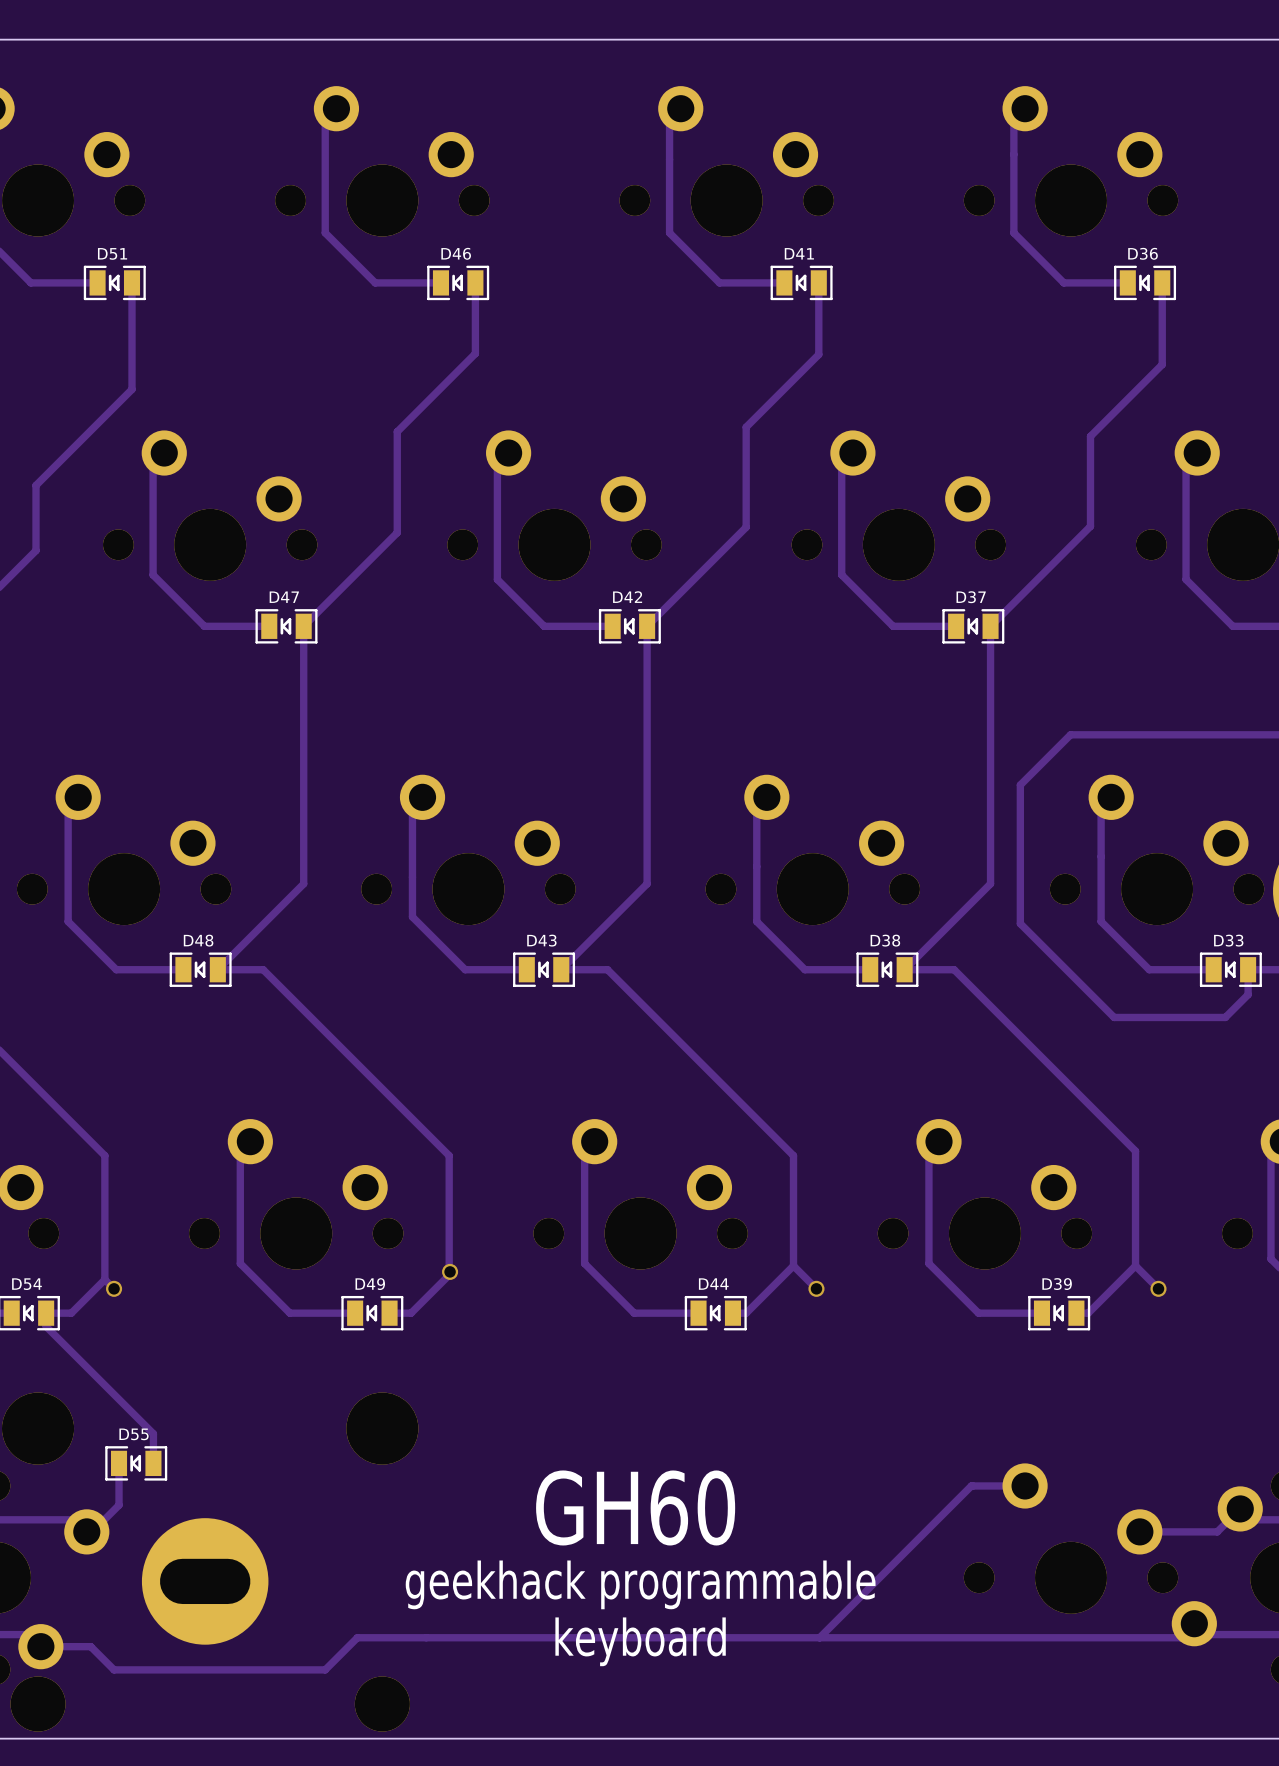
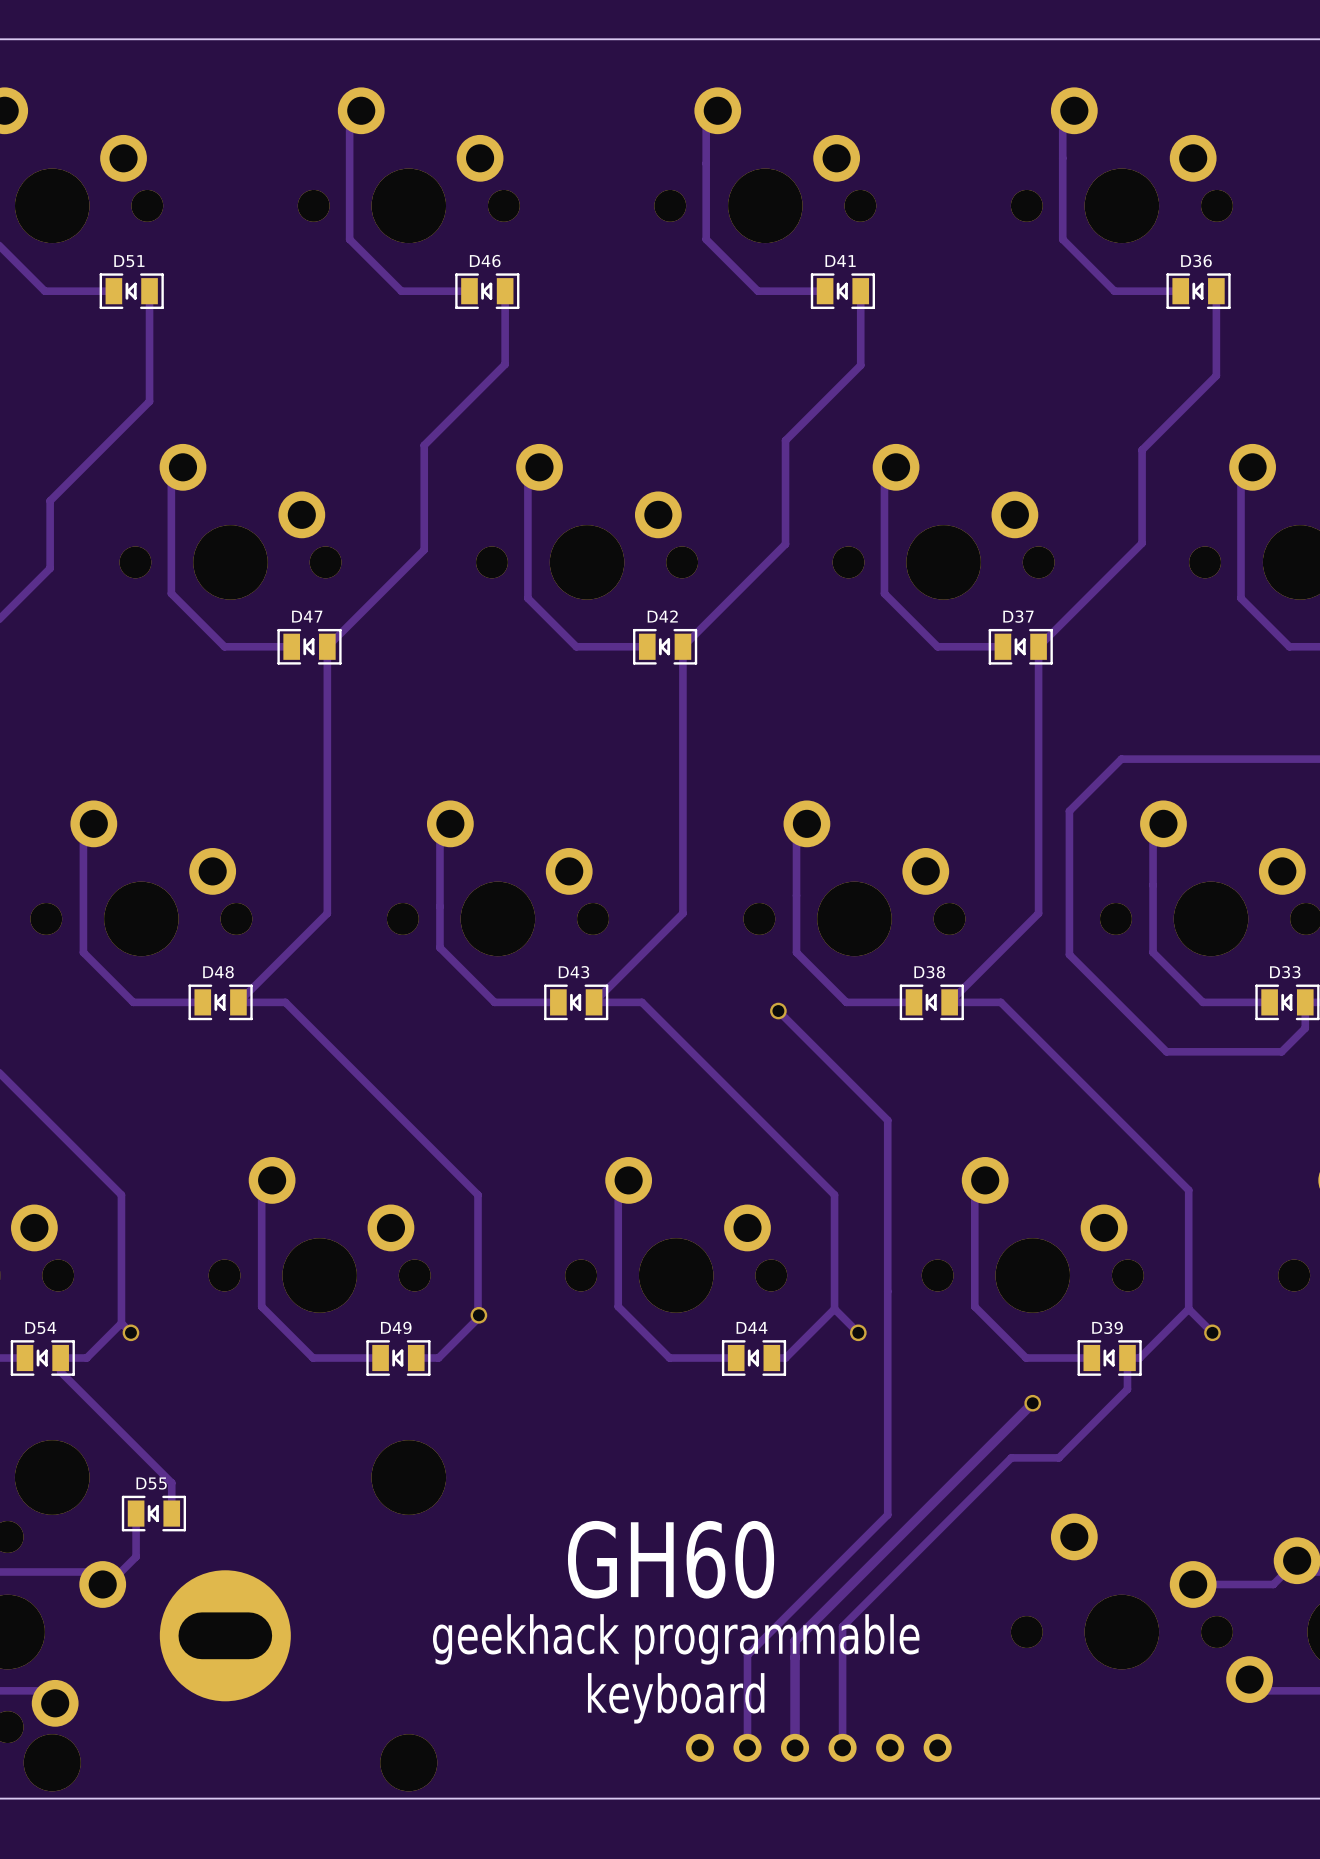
track: none -> (778, 1011) (887, 1120) (887, 1514) (747, 1655) (747, 1747)
via: none -> (778, 1011)
track: none -> (1127, 1358) (1127, 1389) (1058, 1457) (1011, 1457) (842, 1626) (842, 1747)
track: none -> (1032, 1403) (795, 1640) (795, 1747)
via: none -> (1032, 1403)
track: (1025, 1485) (971, 1485) (819, 1637) -> none
track: (1194, 1623) (1180, 1637) (357, 1637) (325, 1669) (114, 1669) (90, 1646) (40, 1646) -> none
part: none -> (699, 1747)
part: none -> (747, 1747)
part: none -> (795, 1747)
part: none -> (842, 1747)
part: none -> (890, 1747)
part: none -> (937, 1747)

